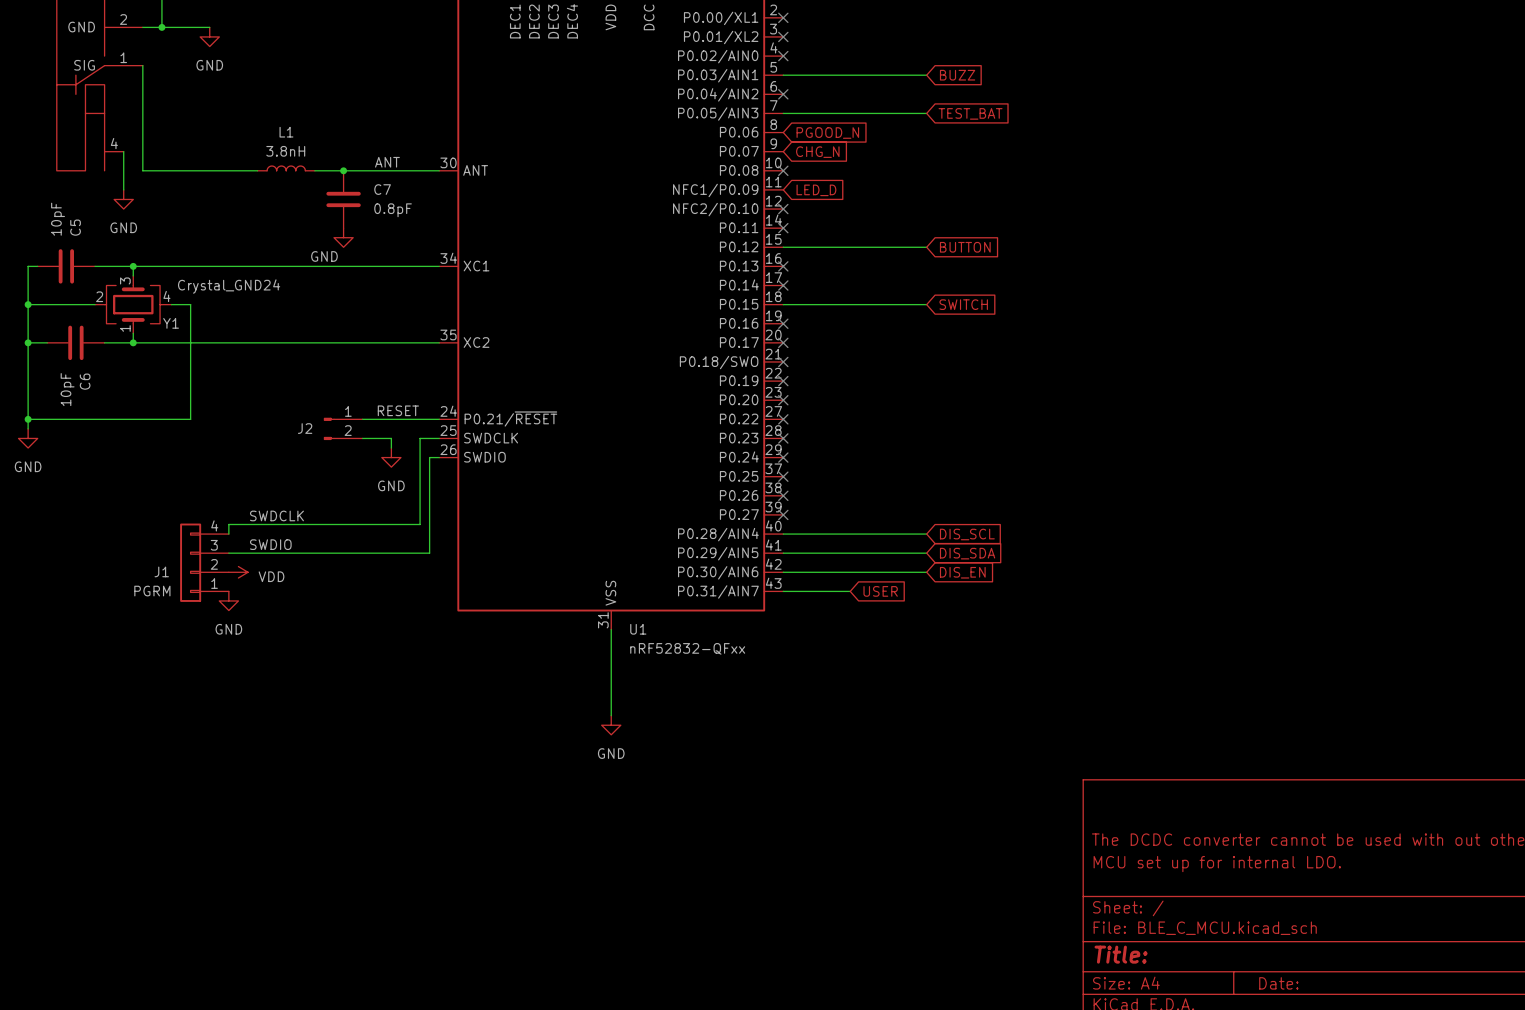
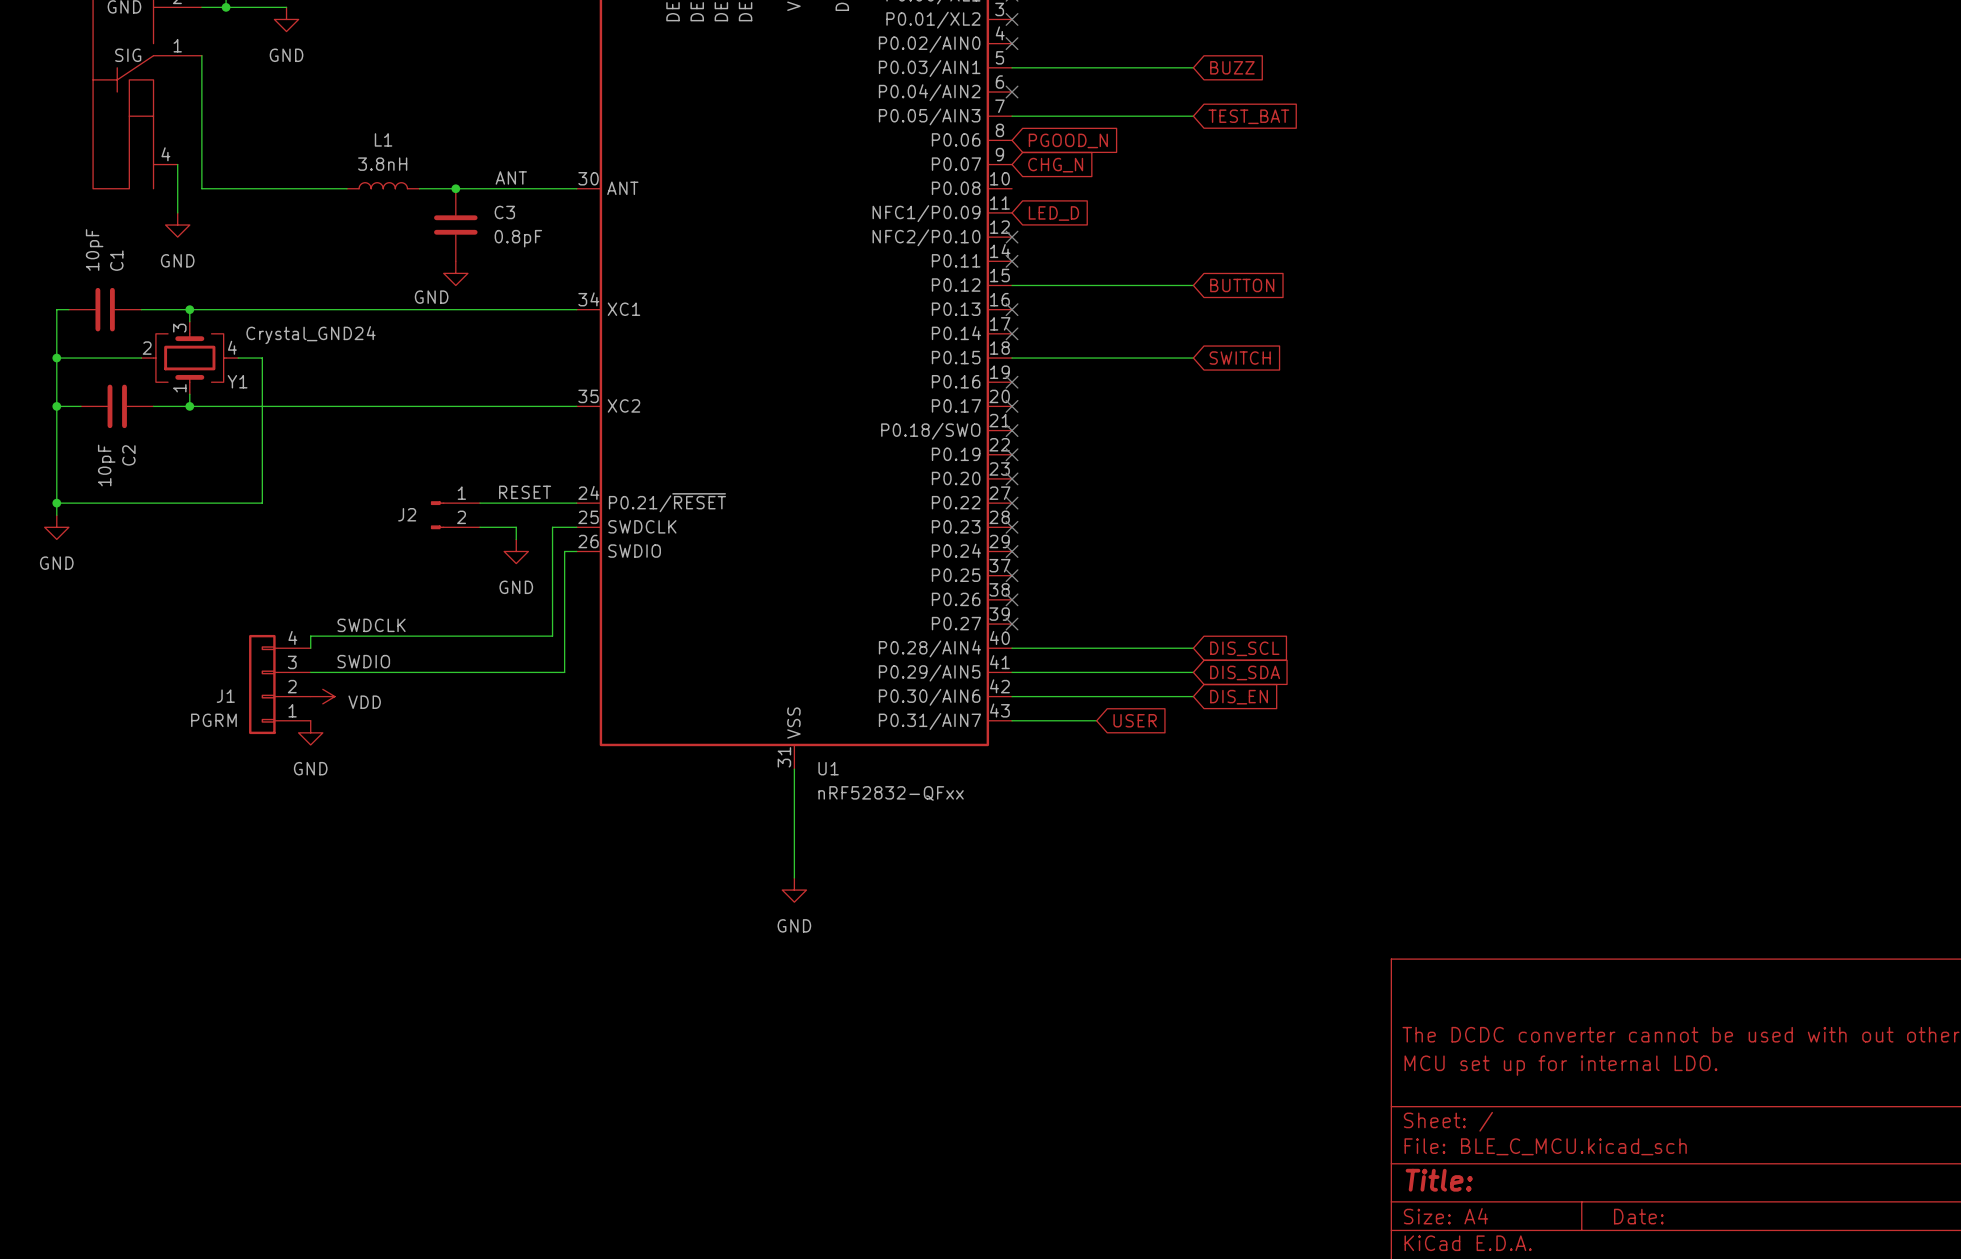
no-connect mark: (783, 170) -> none
C7 name: C7 (382, 189) -> C3 (504, 212)
C5 name: C5 (75, 227) -> C1 (116, 260)
C6 name: C6 (85, 381) -> C2 (128, 455)

